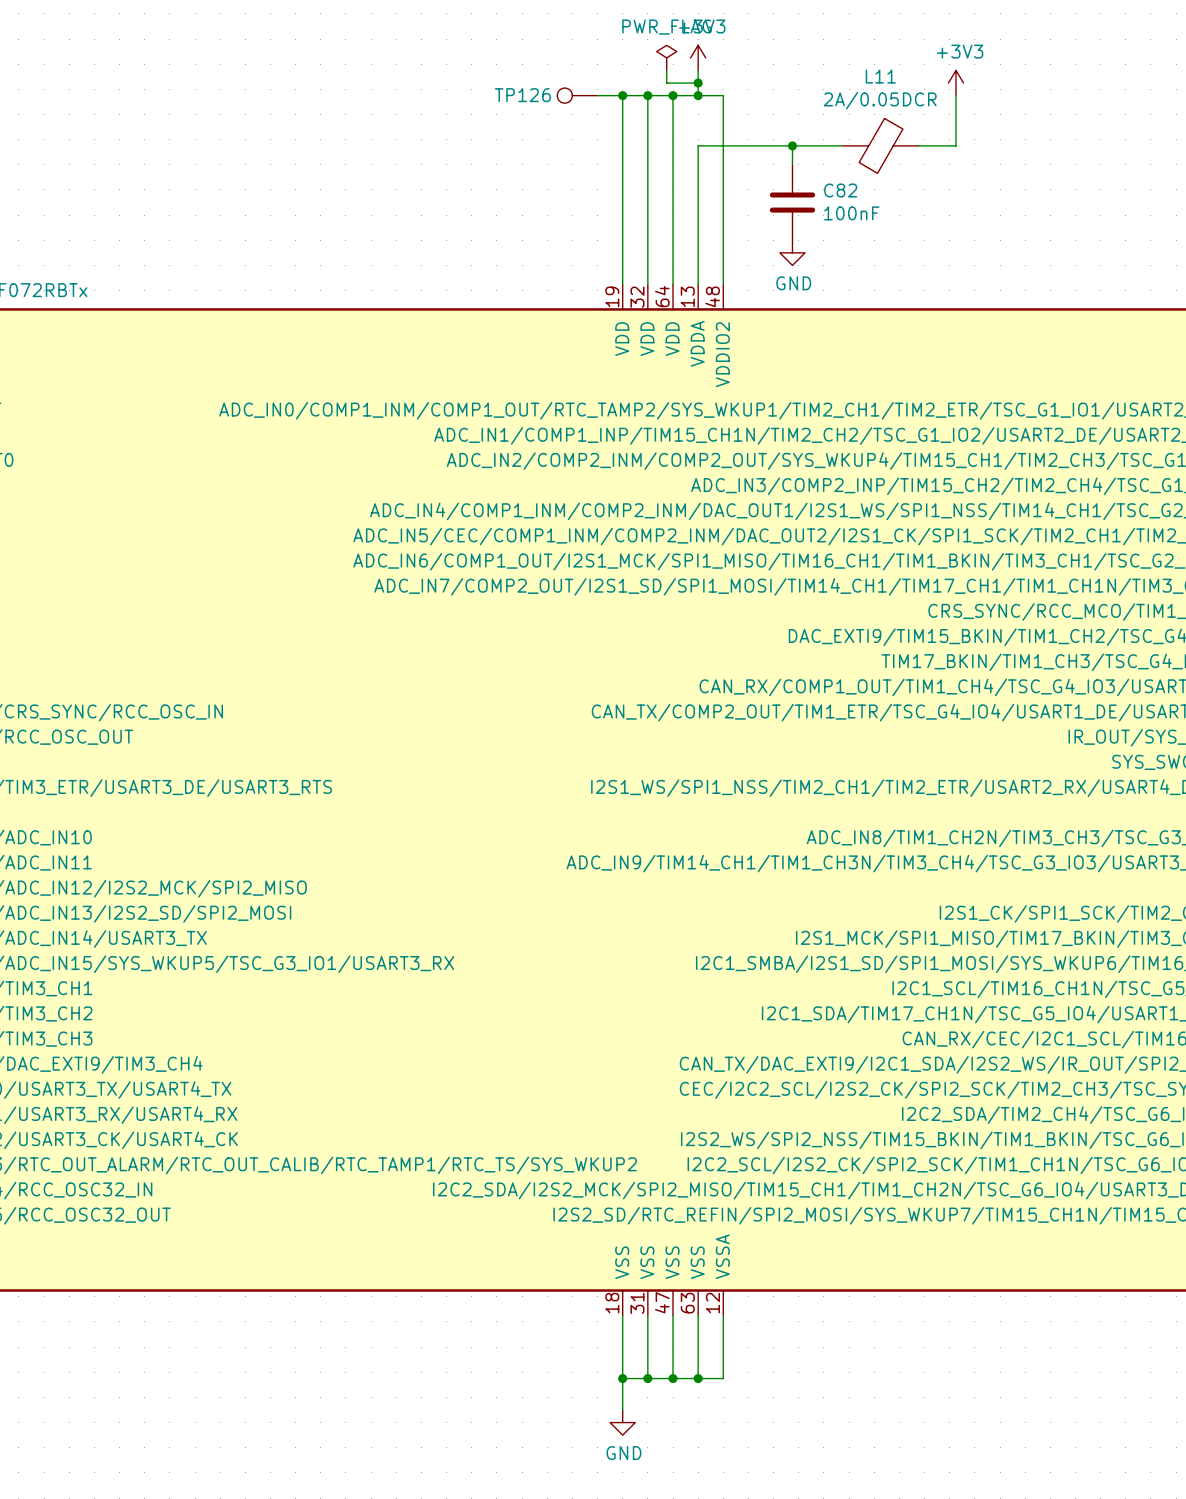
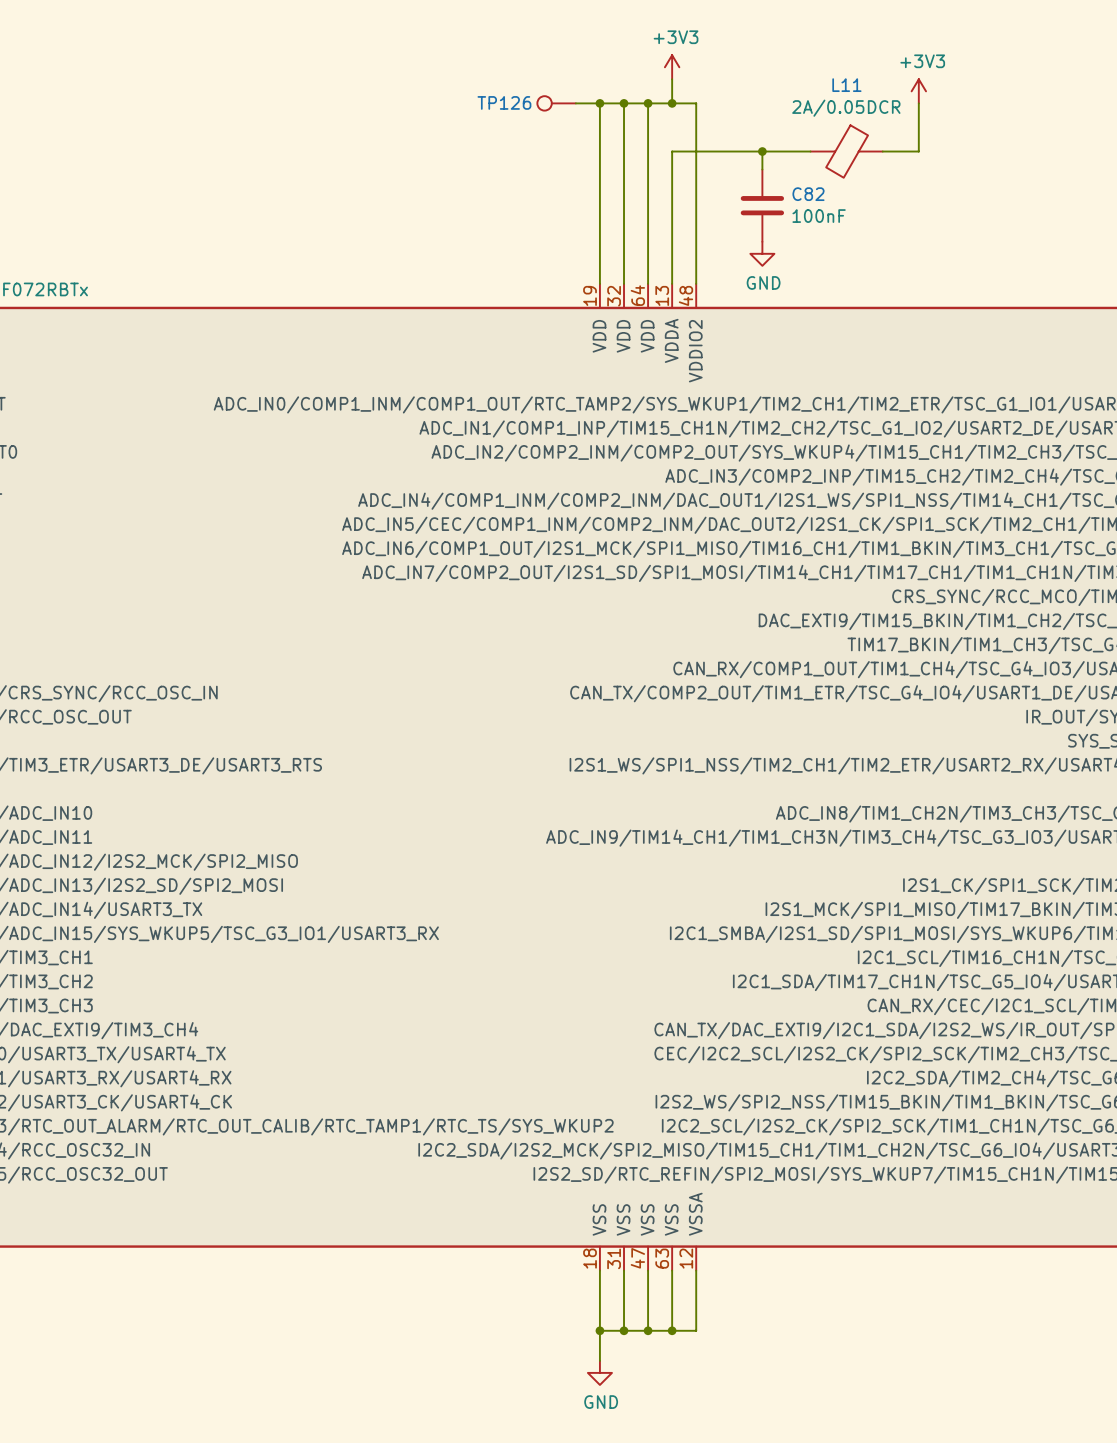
power symbol: PWR_FLAG (666, 57) -> none
wire: (666, 70) (666, 83) (698, 83) -> none
junction: (698, 83) -> none

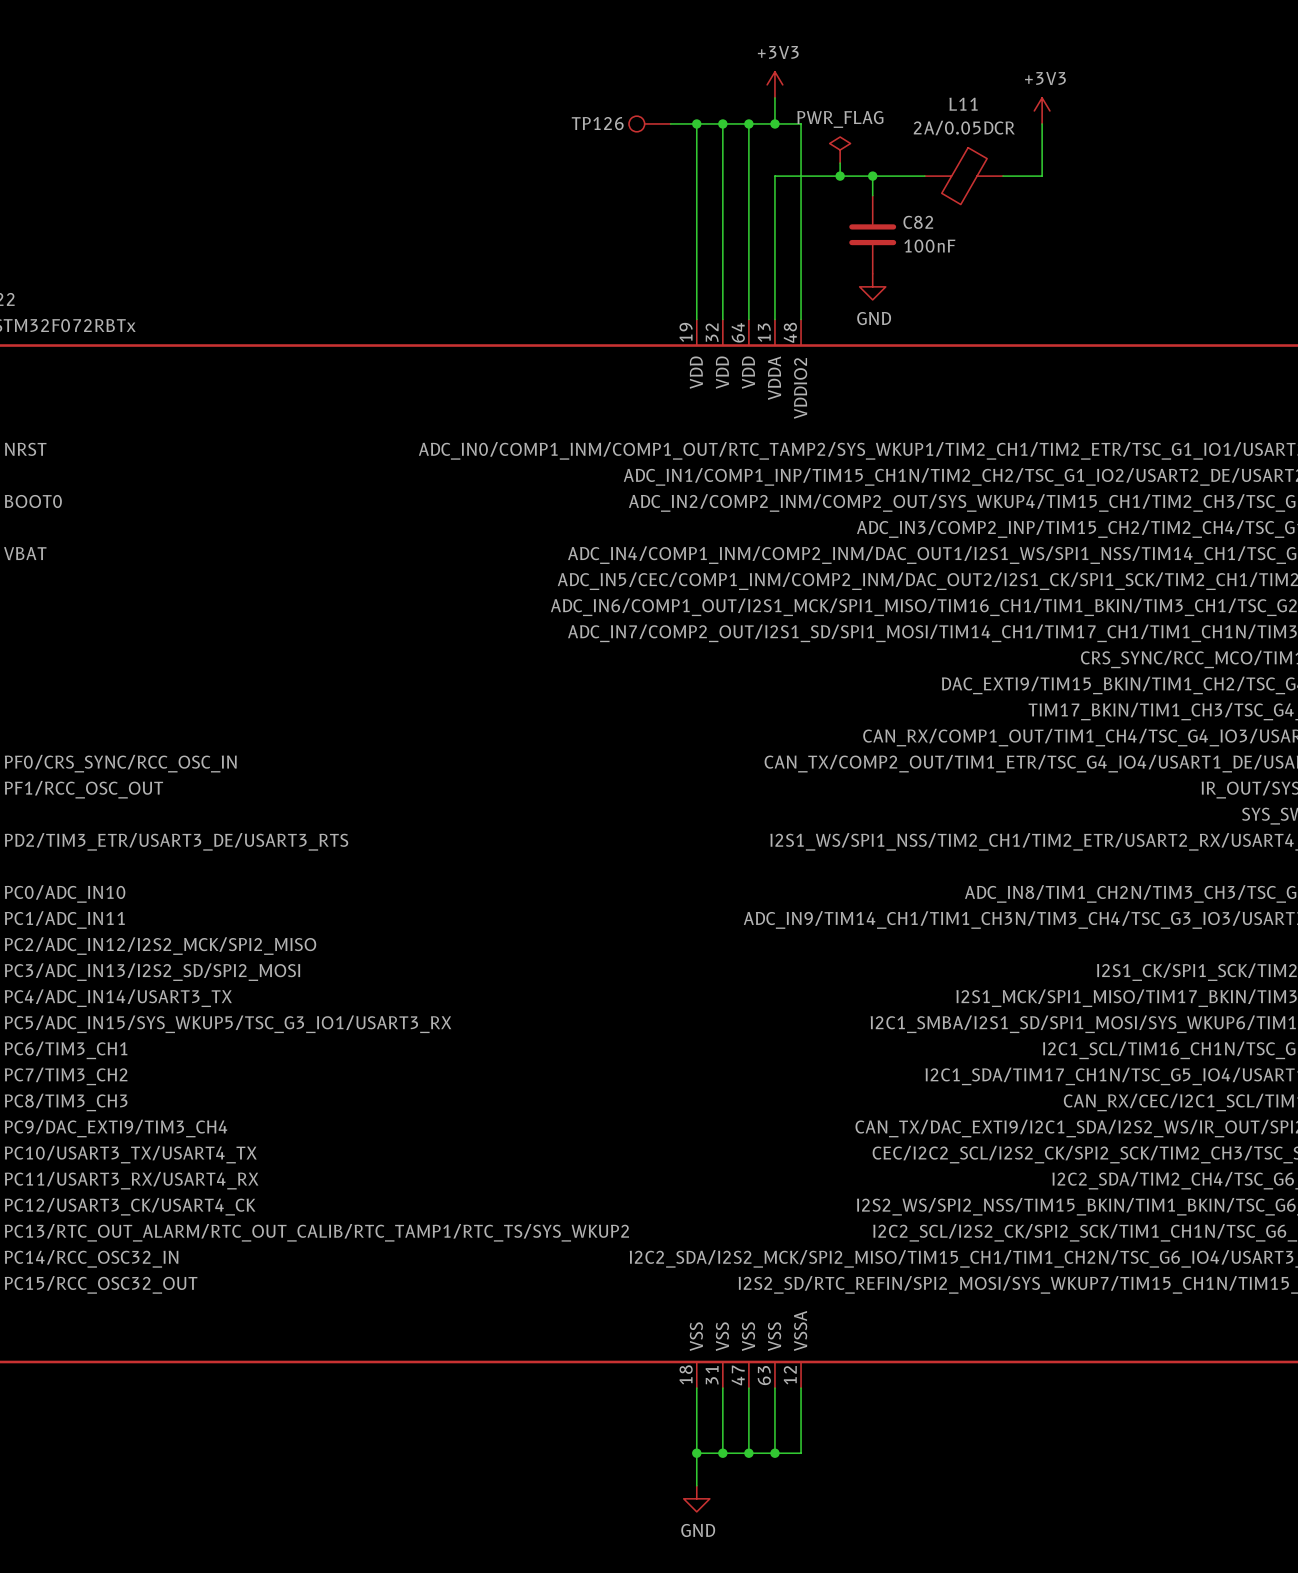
power symbol: none -> PWR_FLAG (840, 150)
wire: none -> (840, 163) (840, 176)
junction: none -> (840, 176)

